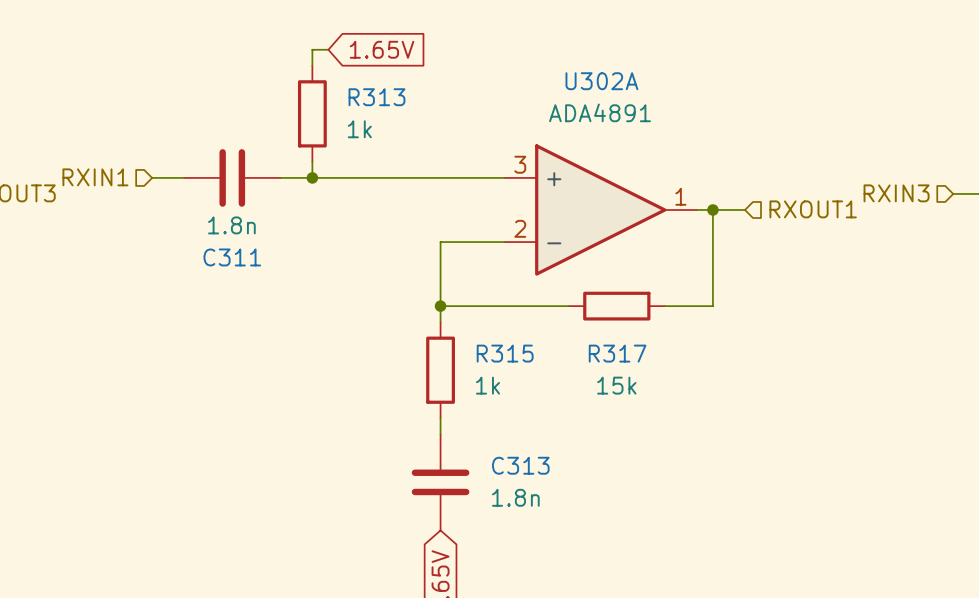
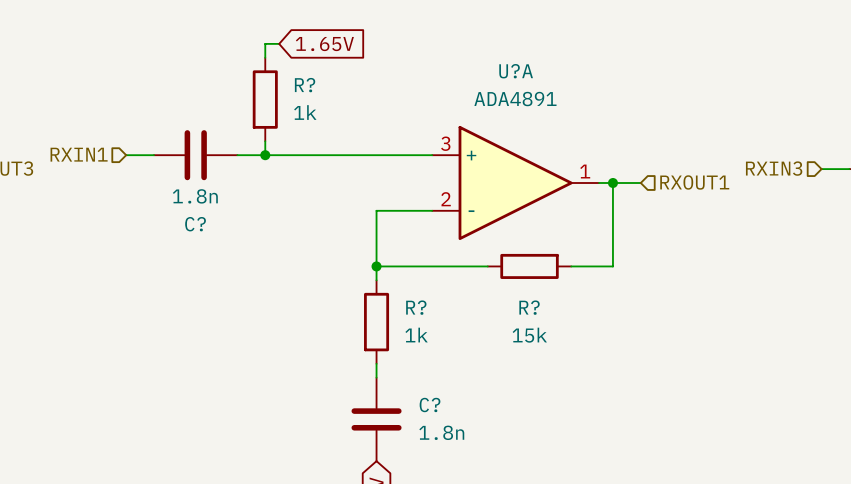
U302A name: U302A (601, 81) -> U?A (516, 71)
R313 name: R313 (376, 97) -> R? (305, 85)
C311 name: C311 (232, 257) -> C? (195, 224)
R315 name: R315 (505, 353) -> R? (416, 307)
R317 name: R317 (617, 353) -> R? (529, 307)
C313 name: C313 (520, 465) -> C? (430, 405)

